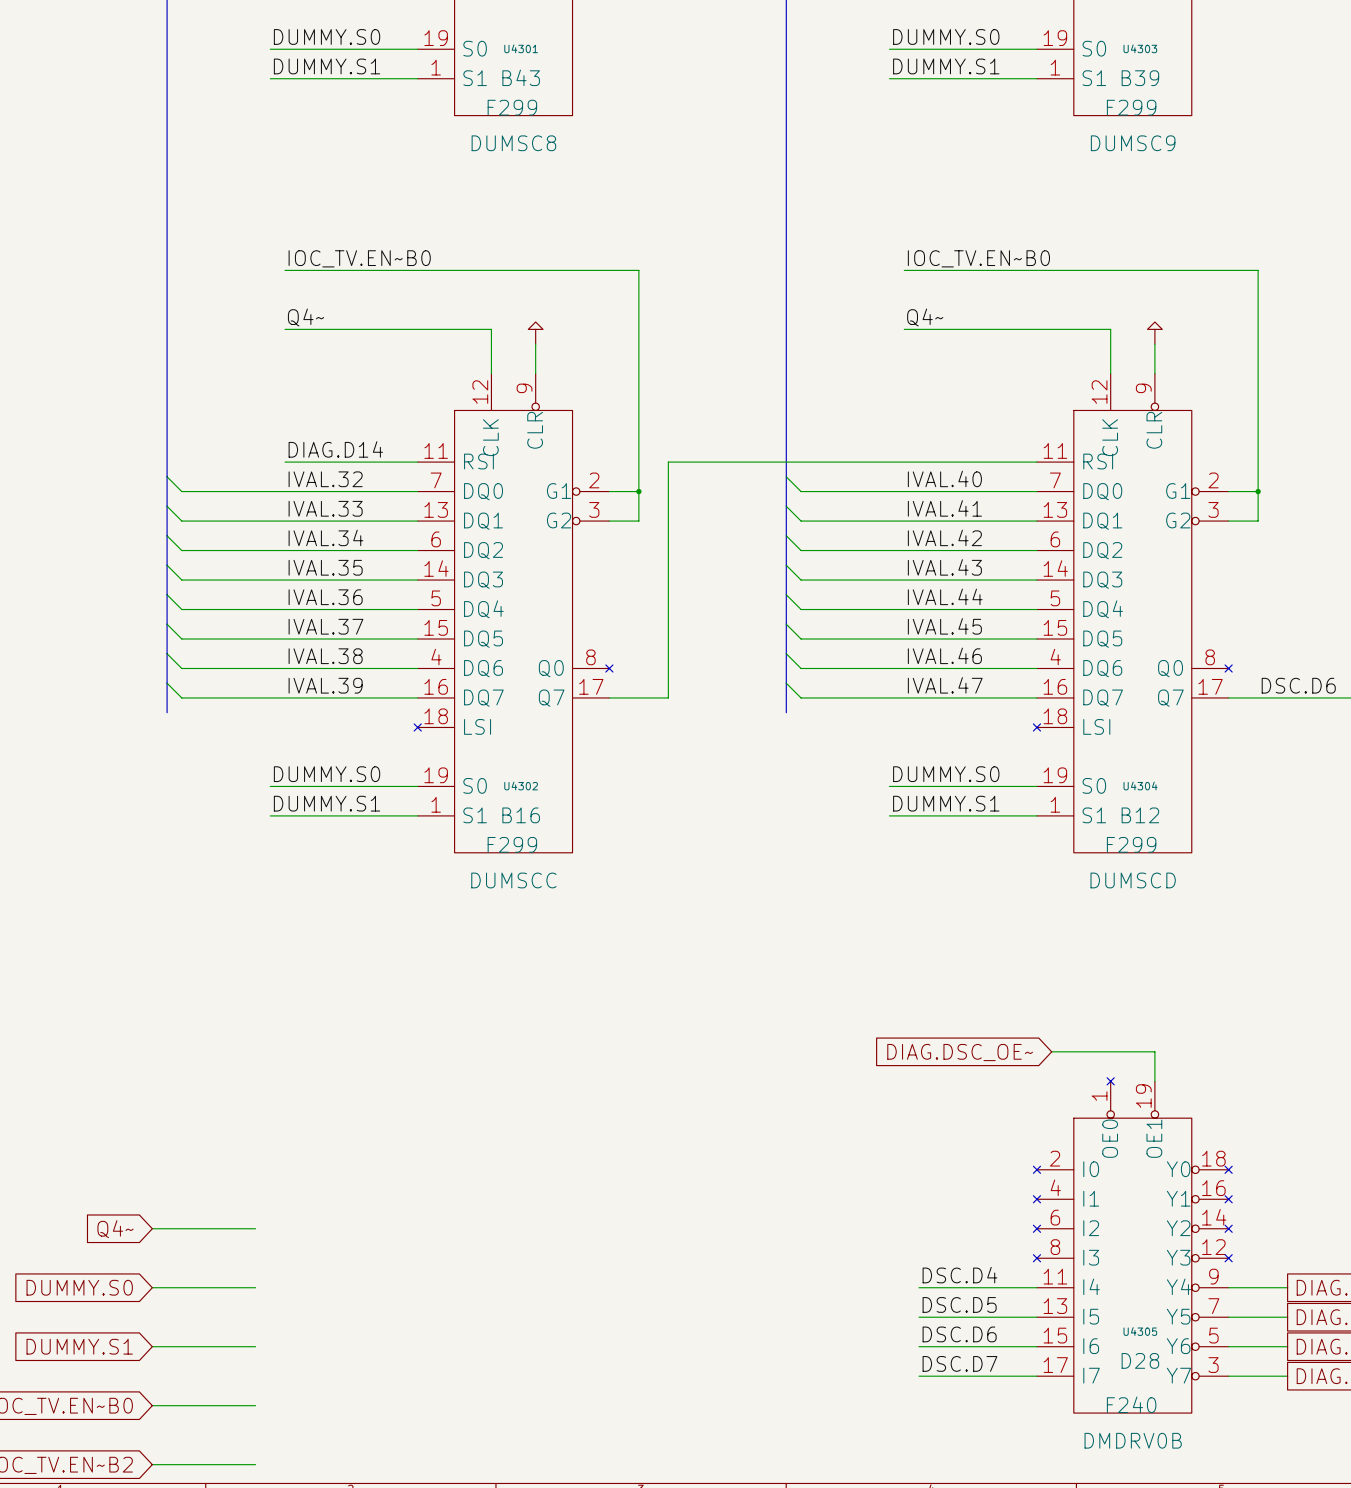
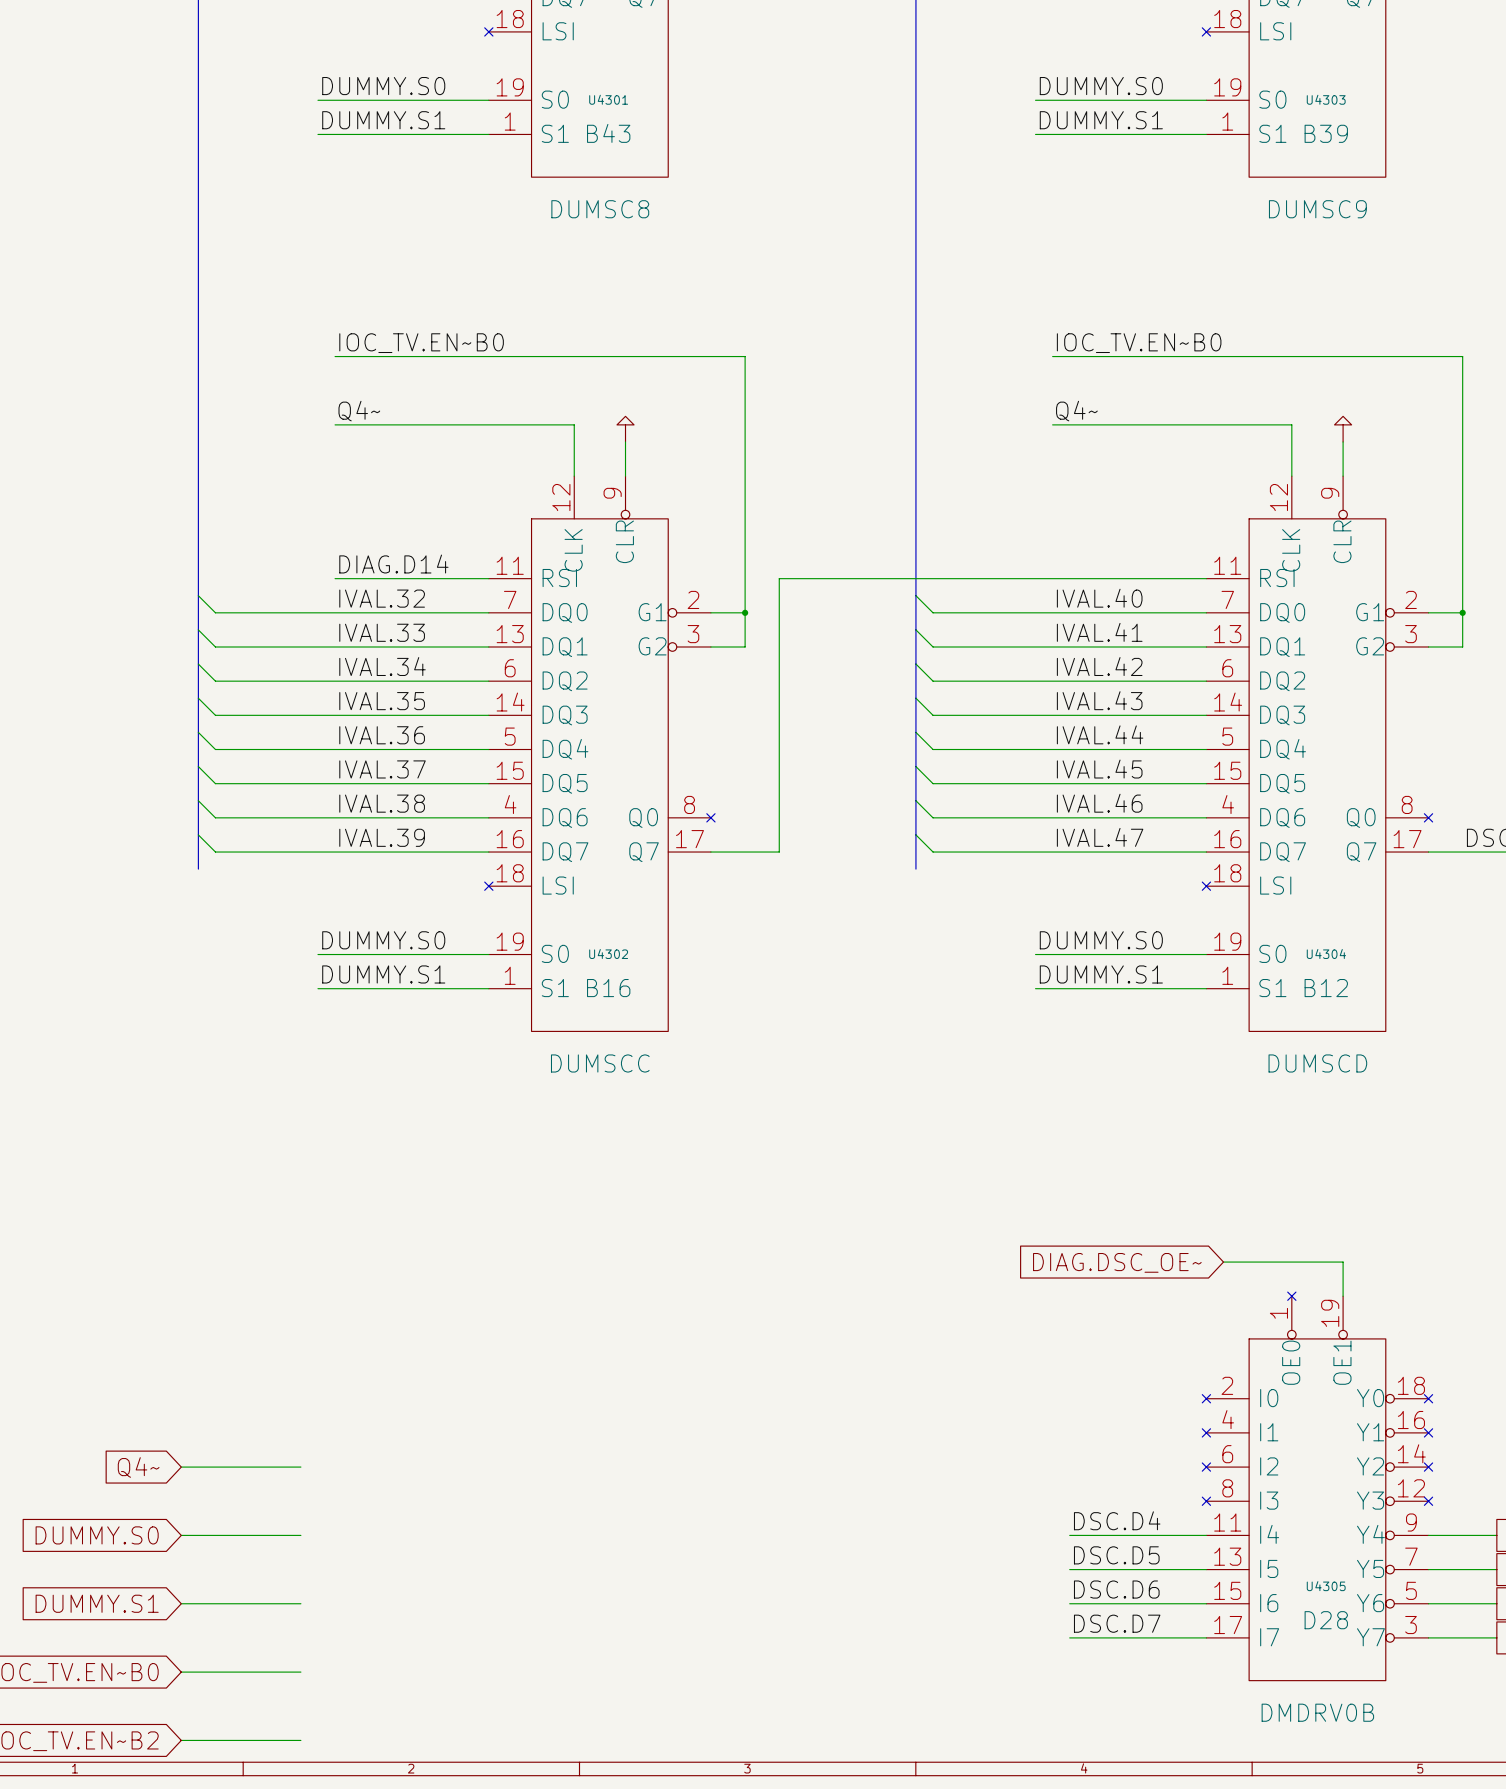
U4301 value: F299 (512, 107) -> none
U4303 value: F299 (1131, 107) -> none
U4302 value: F299 (512, 844) -> none
U4304 value: F299 (1131, 844) -> none
U4305 value: F240 (1131, 1404) -> none

